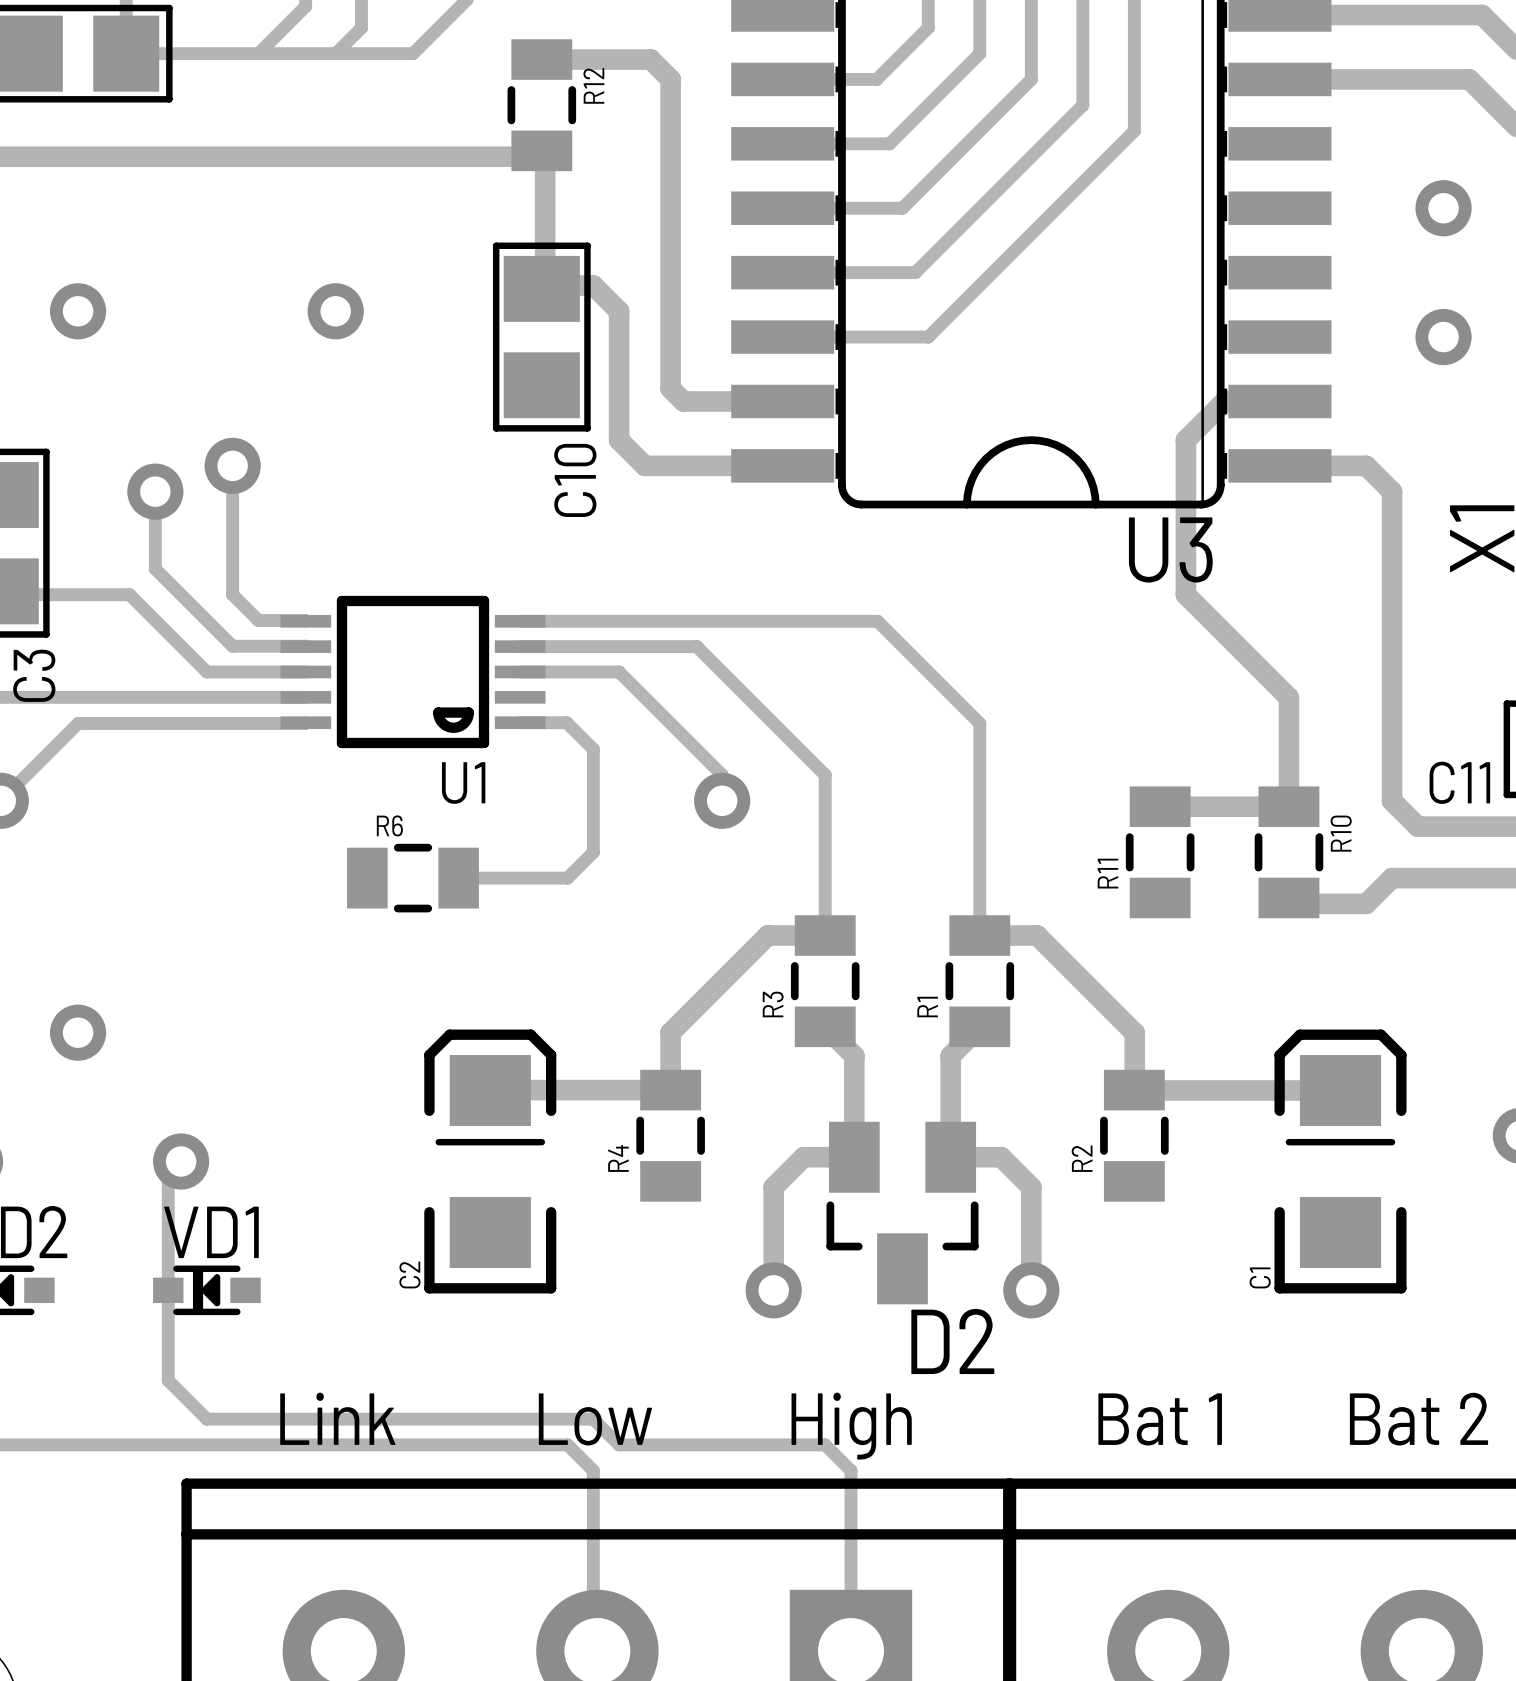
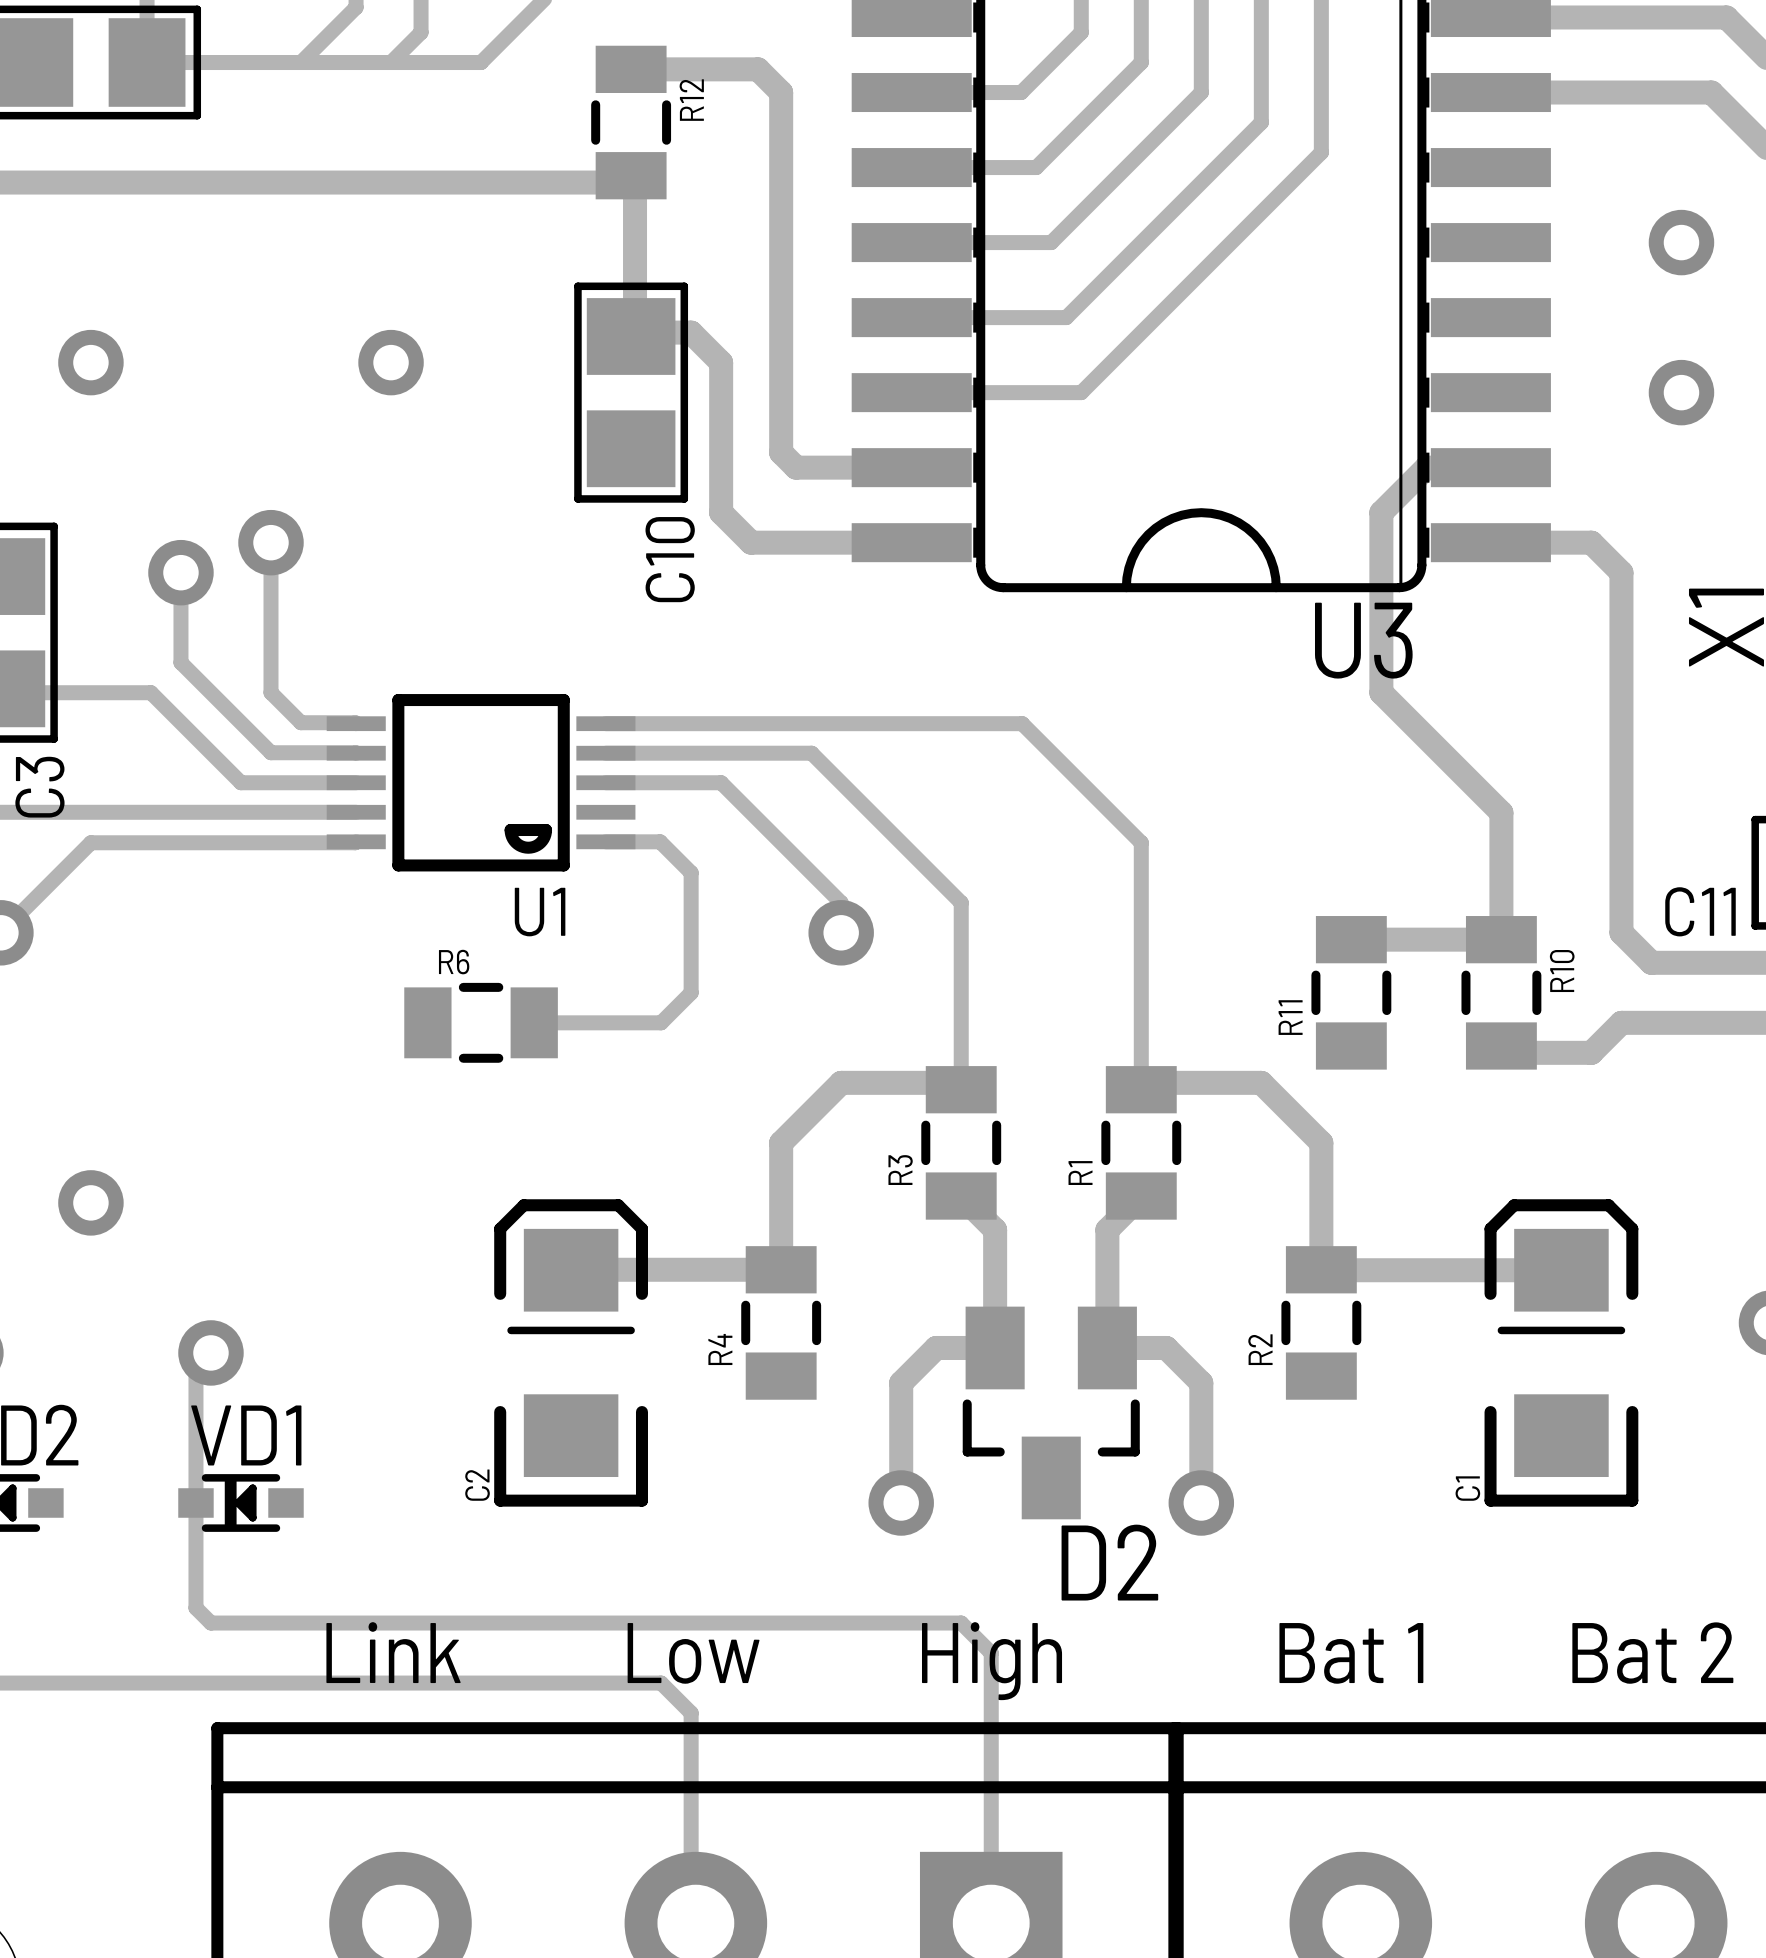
track: (825, 935) (767, 935) (670, 1032) -> (961, 1089) (954, 1082) (841, 1082) (781, 1142) (781, 1202)
track: (979, 935) (1037, 935) (1134, 1033) (1134, 1090) -> (1141, 1089) (1148, 1082) (1261, 1082) (1321, 1142) (1321, 1269)
track: (181, 1393) (206, 1419) (593, 1419) (619, 1444) (825, 1444) (850, 1470) -> (210, 1623) (961, 1623) (991, 1653) (991, 1713)

